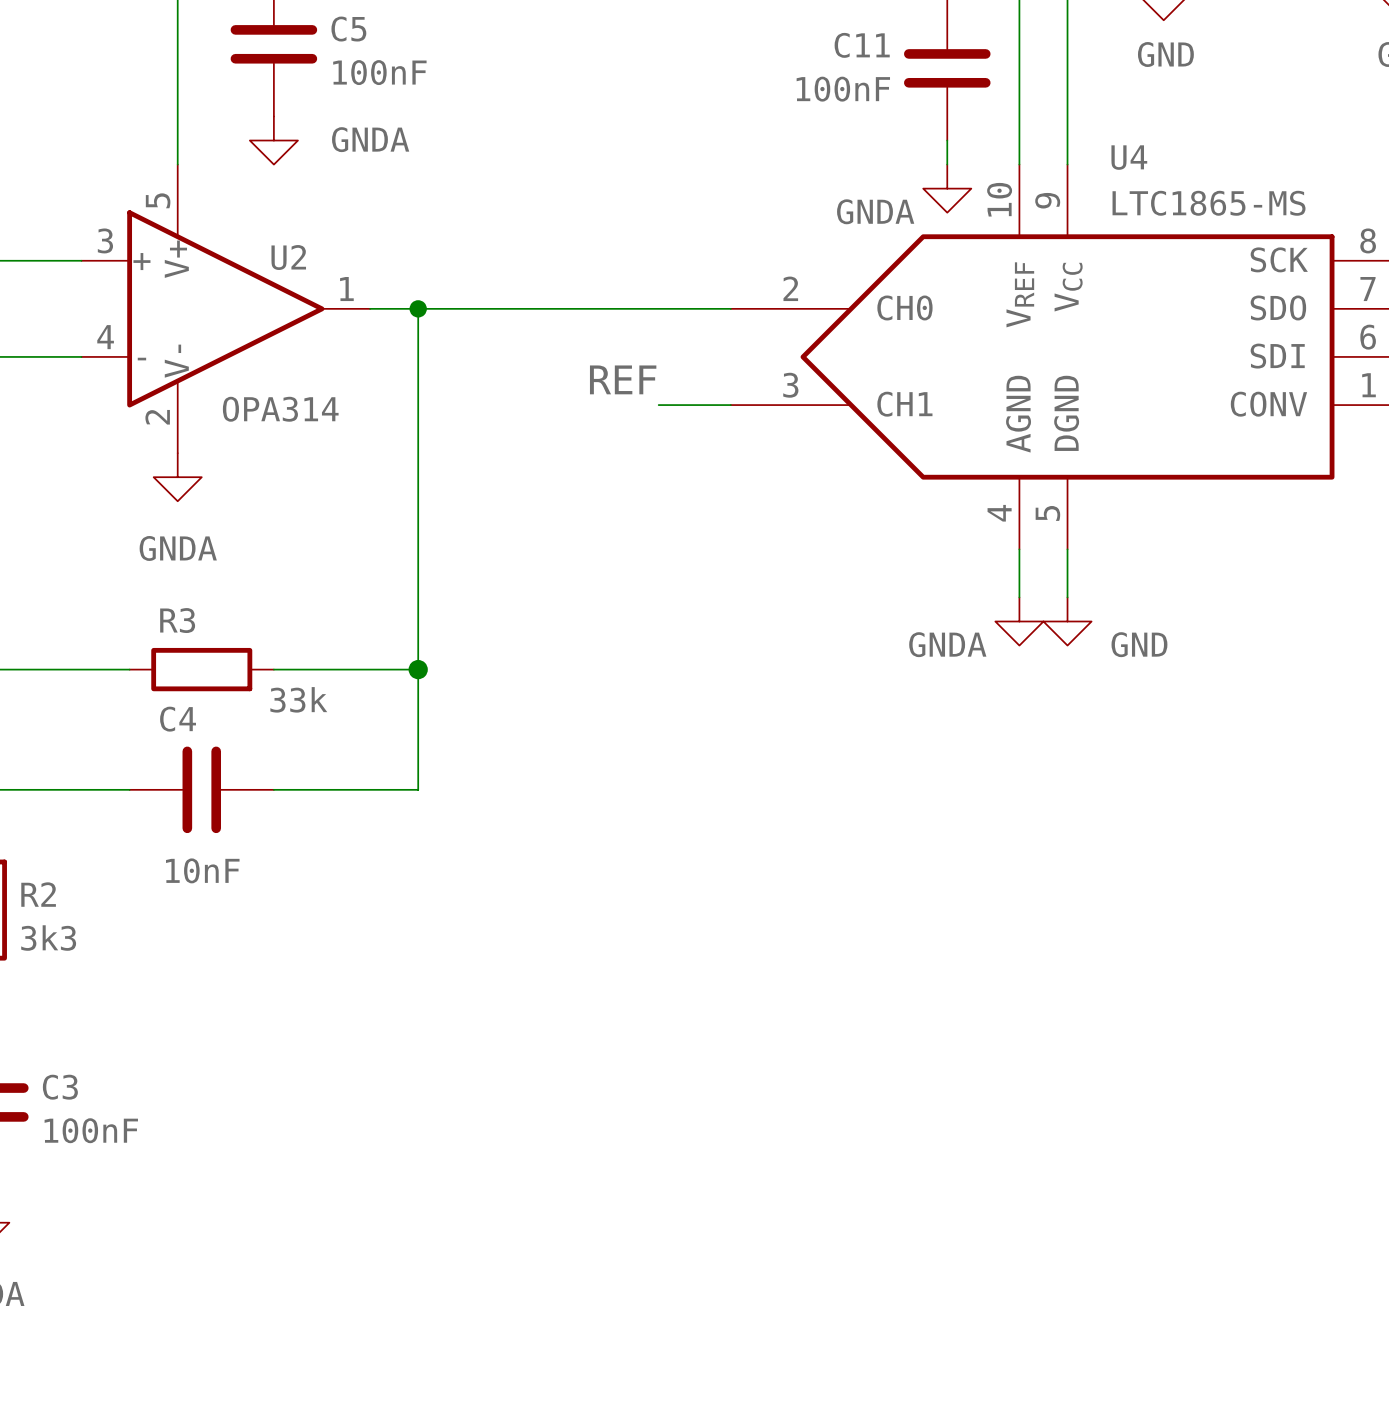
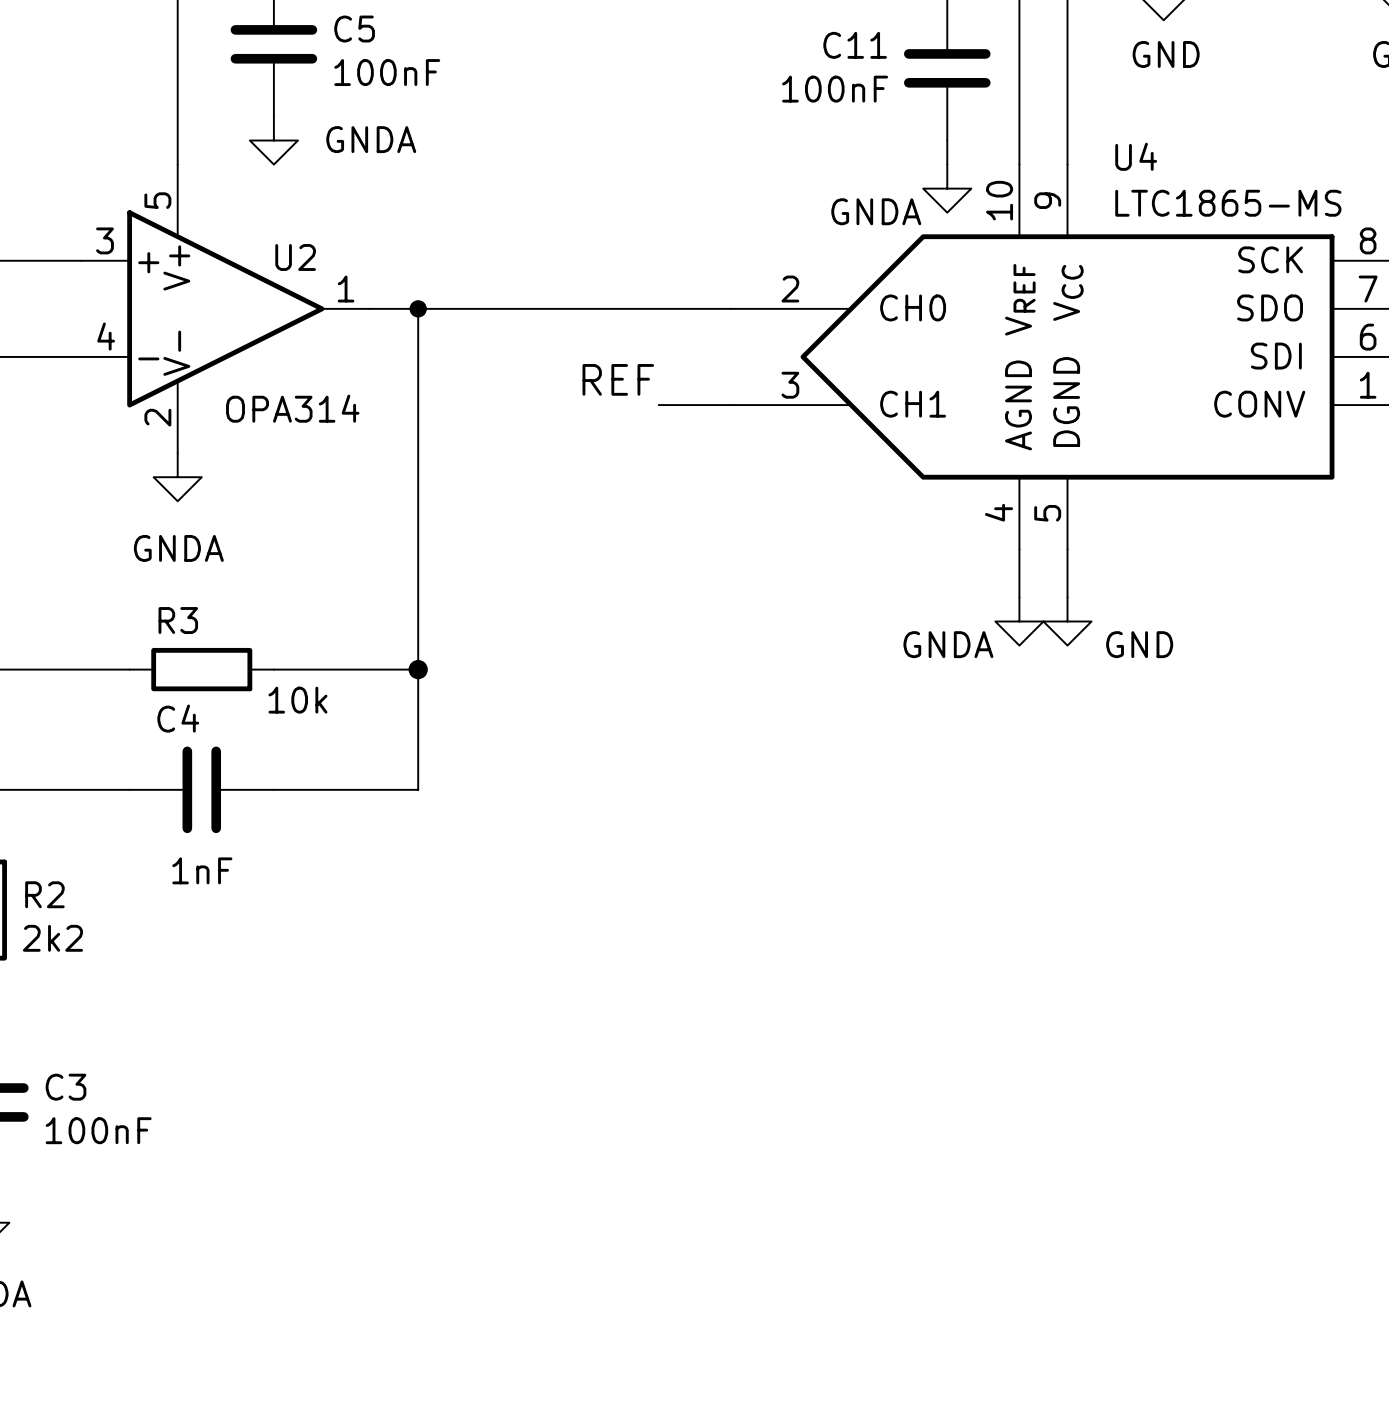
R3 value: 33k (298, 699) -> 10k (297, 700)
C4 value: 10nF (202, 870) -> 1nF (202, 870)
R2 value: 3k3 (48, 938) -> 2k2 (52, 938)

